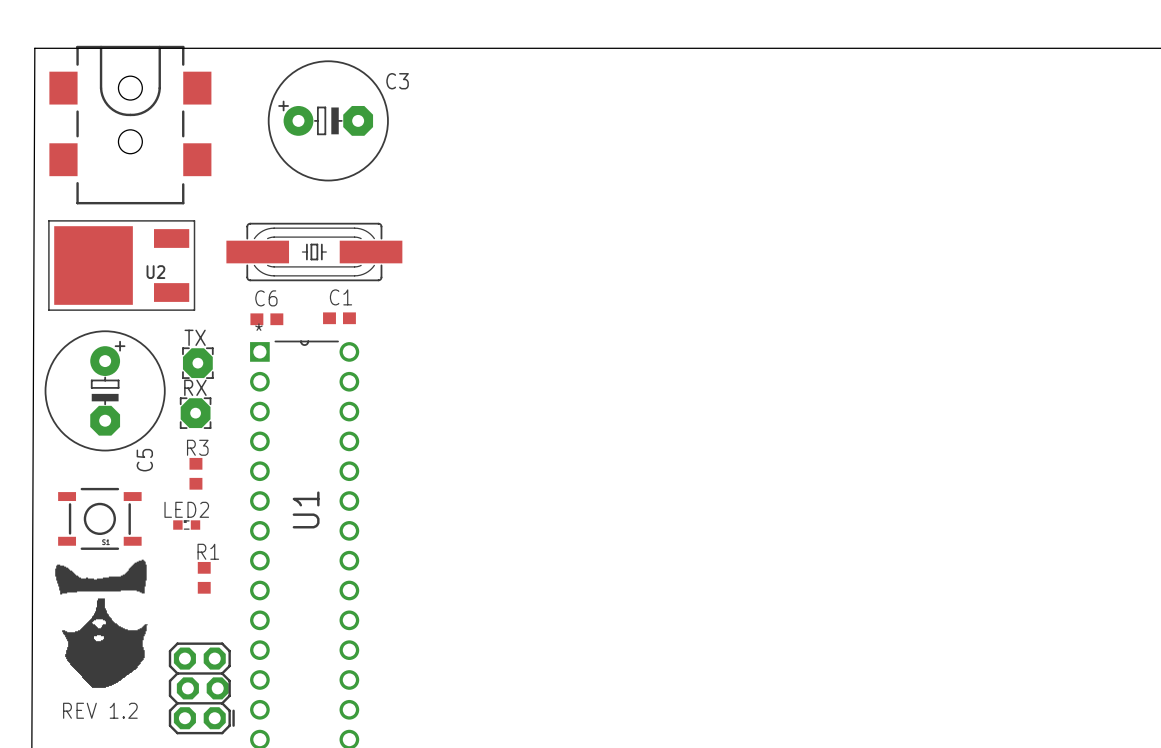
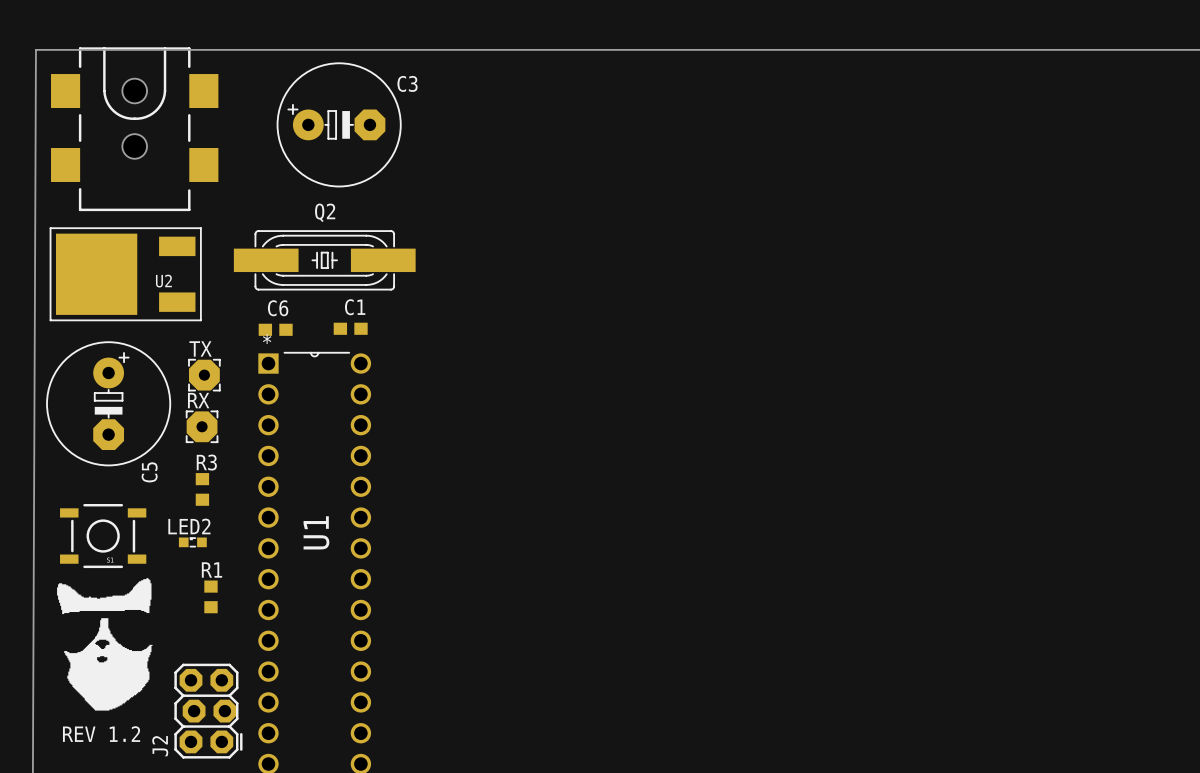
Q2 name: none -> Q2 (325, 212)
J2 name: none -> J2 (160, 746)

